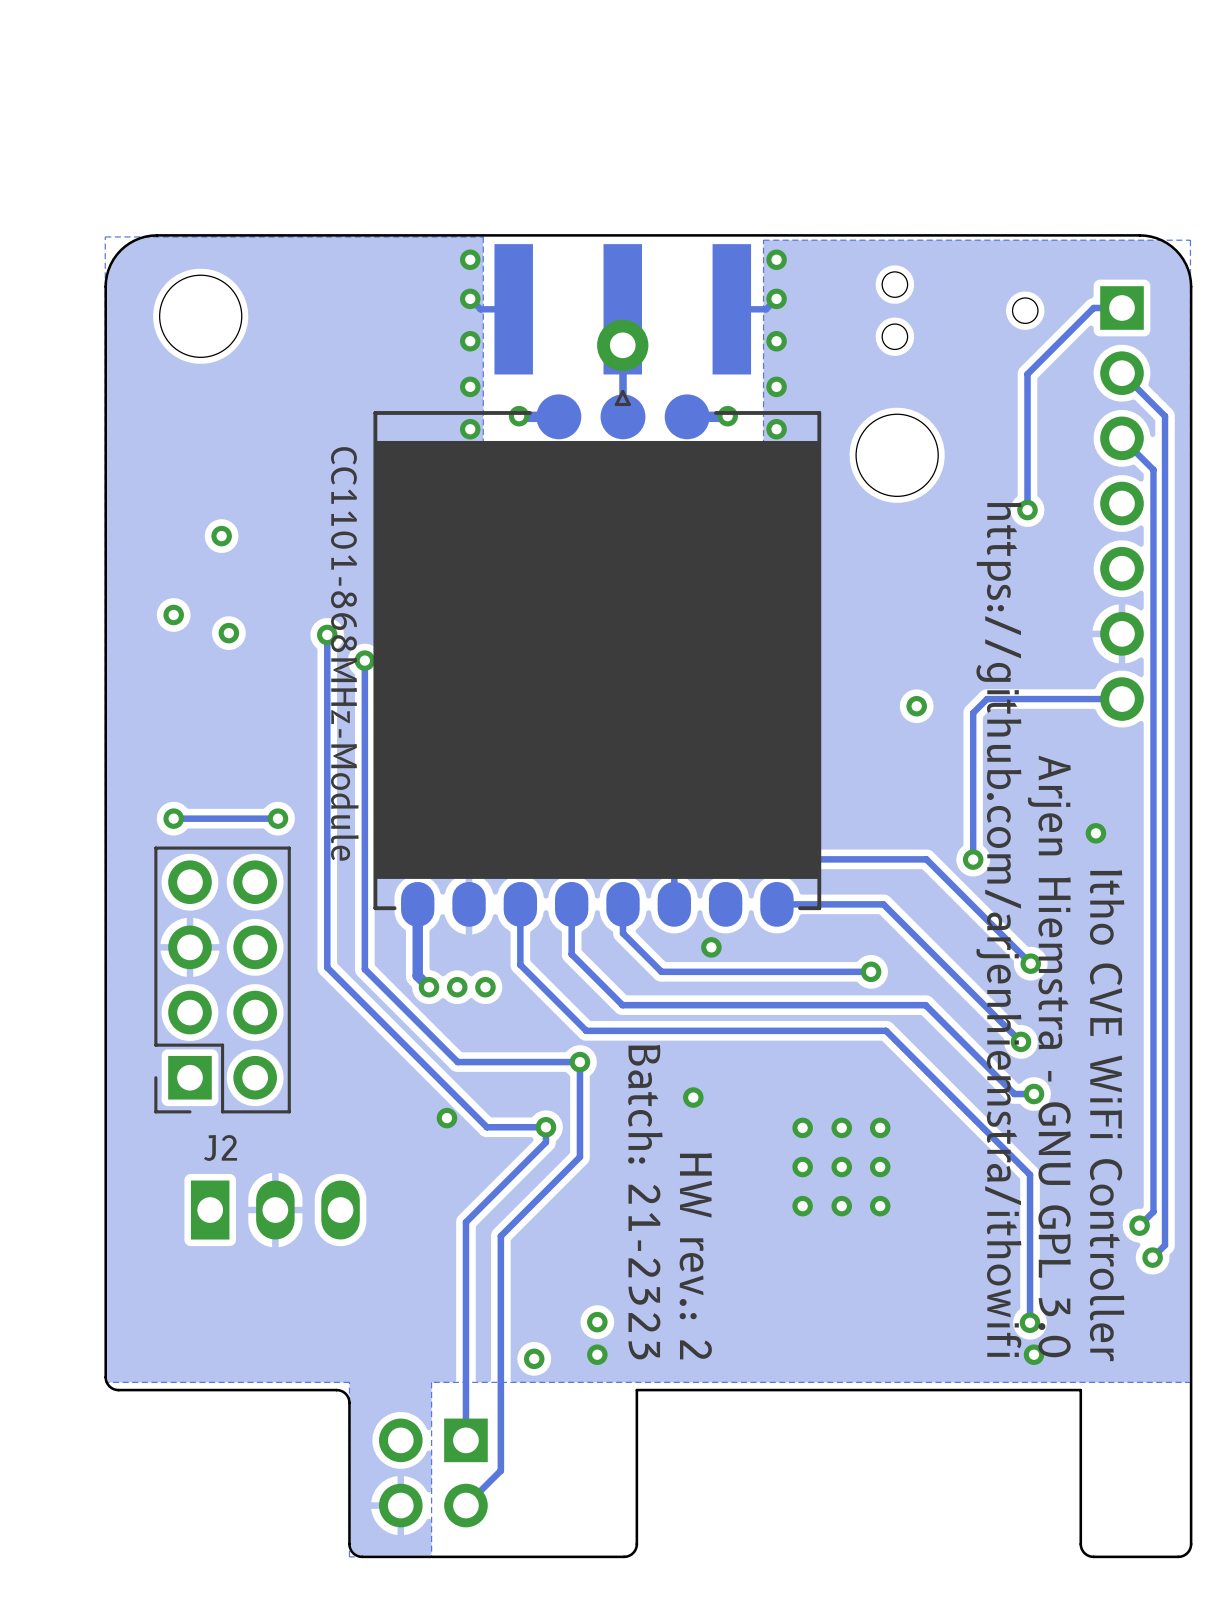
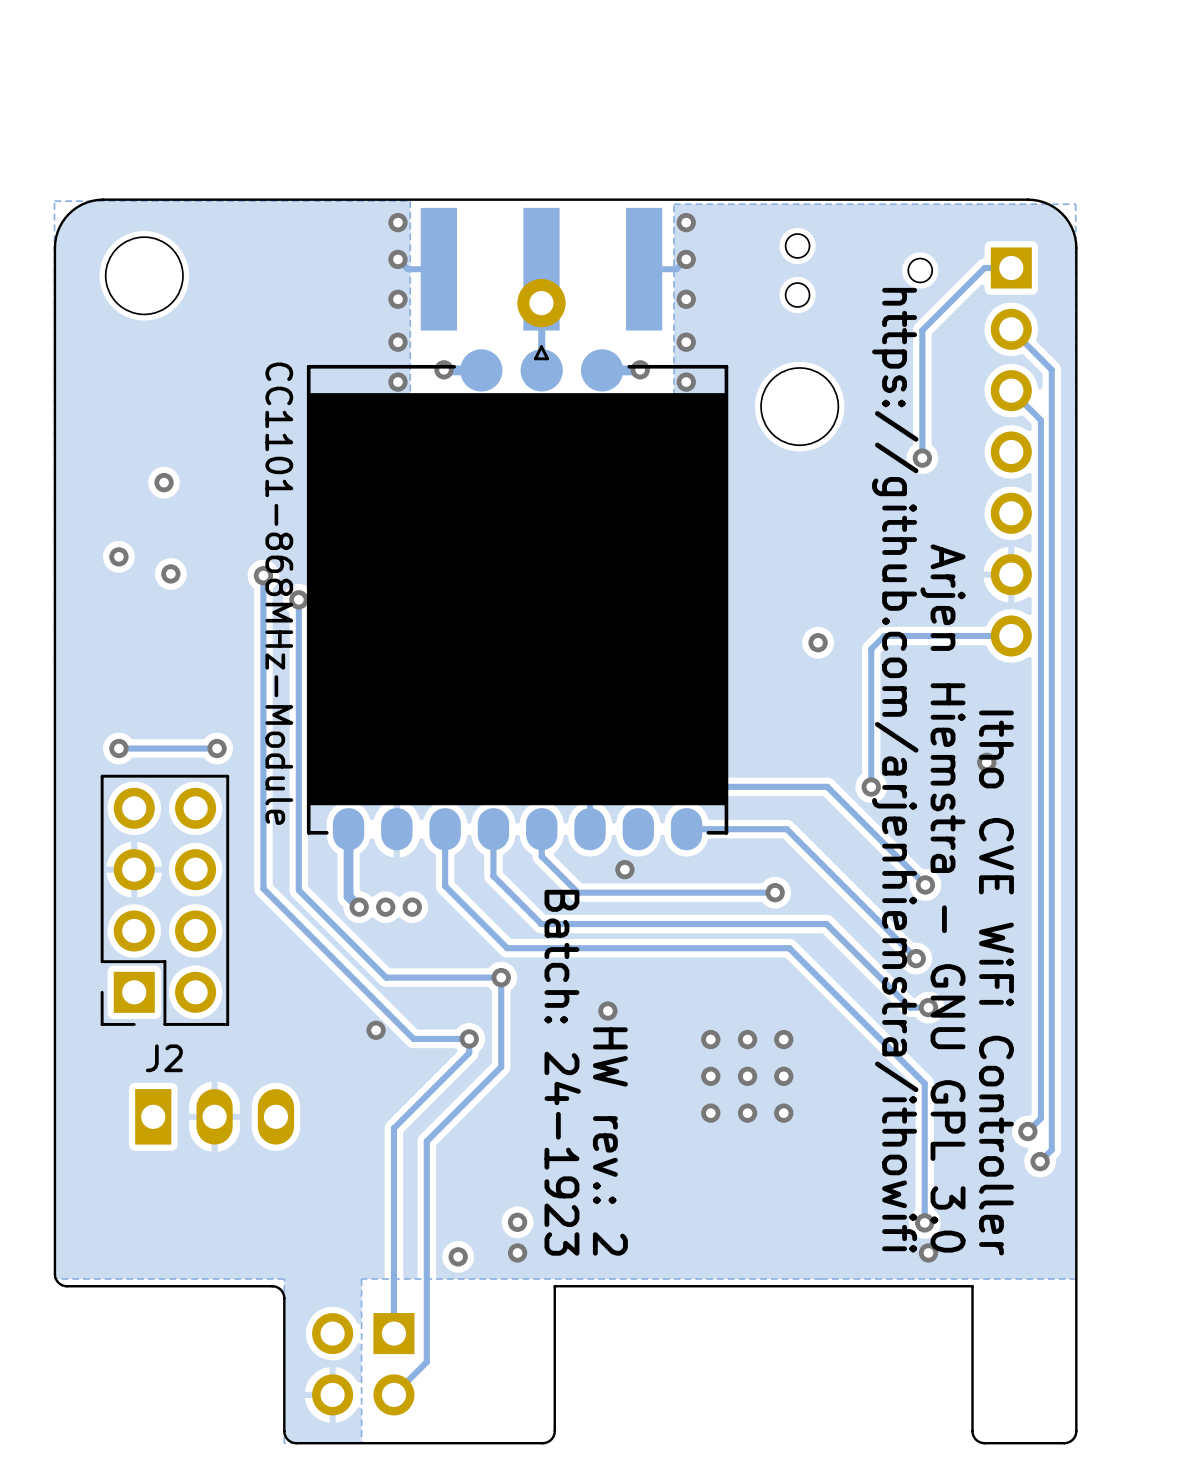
text: Batch: 21-2323 (645, 1202) -> Batch: 24-1923 (562, 1072)

